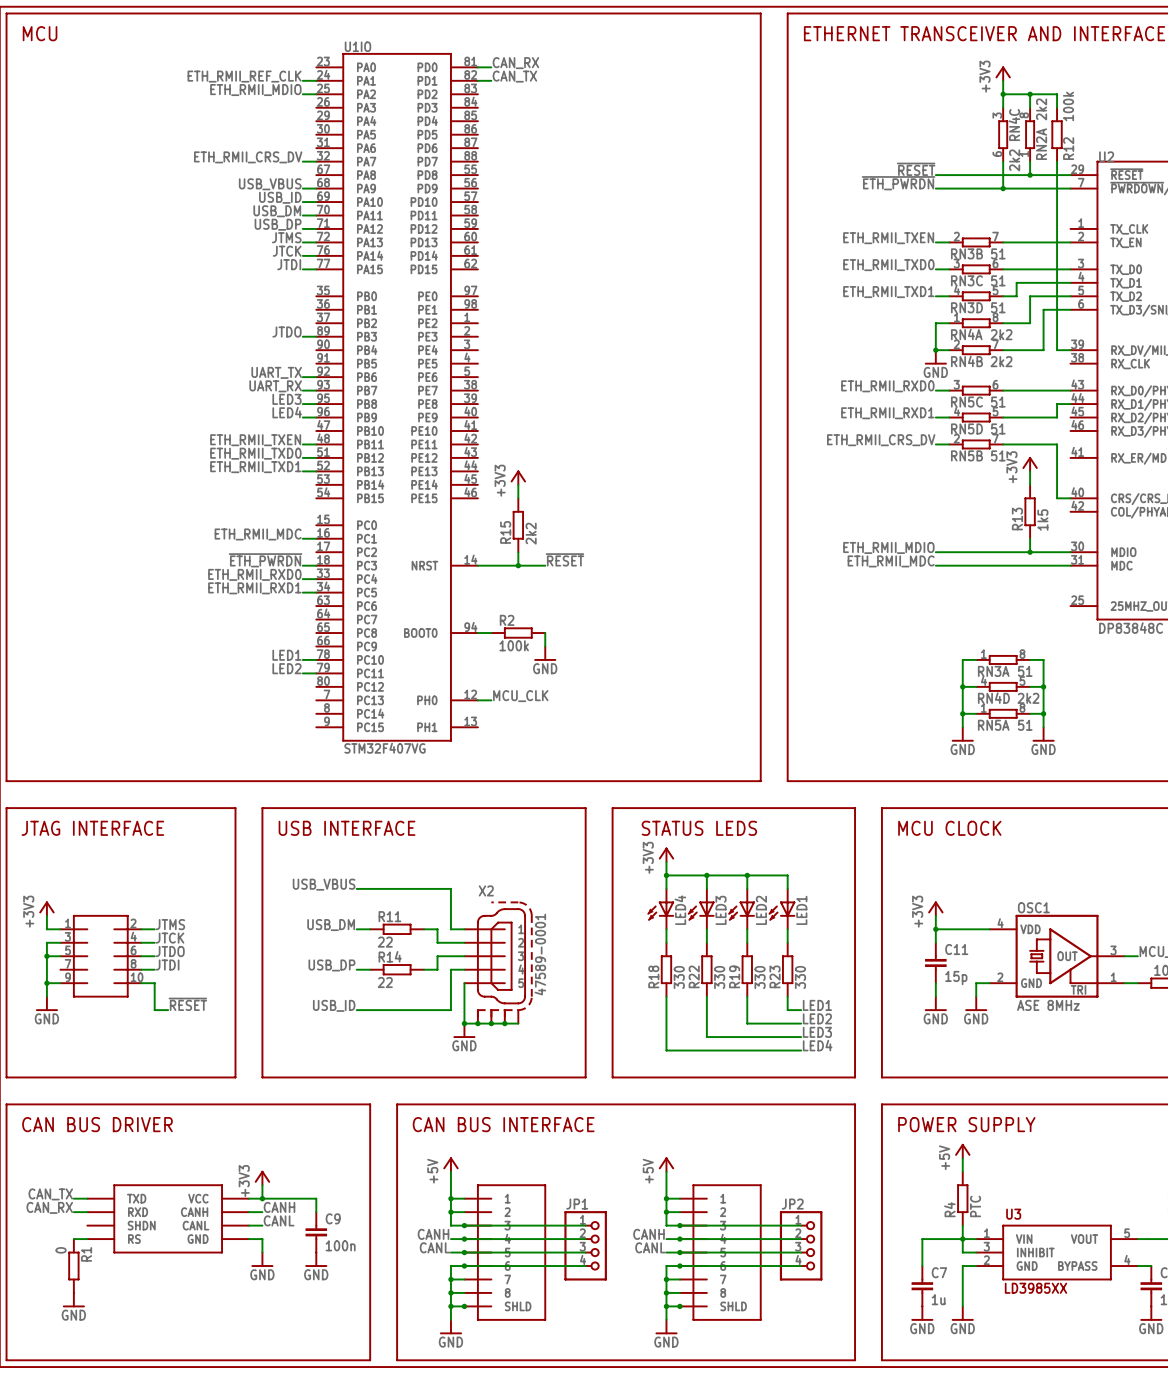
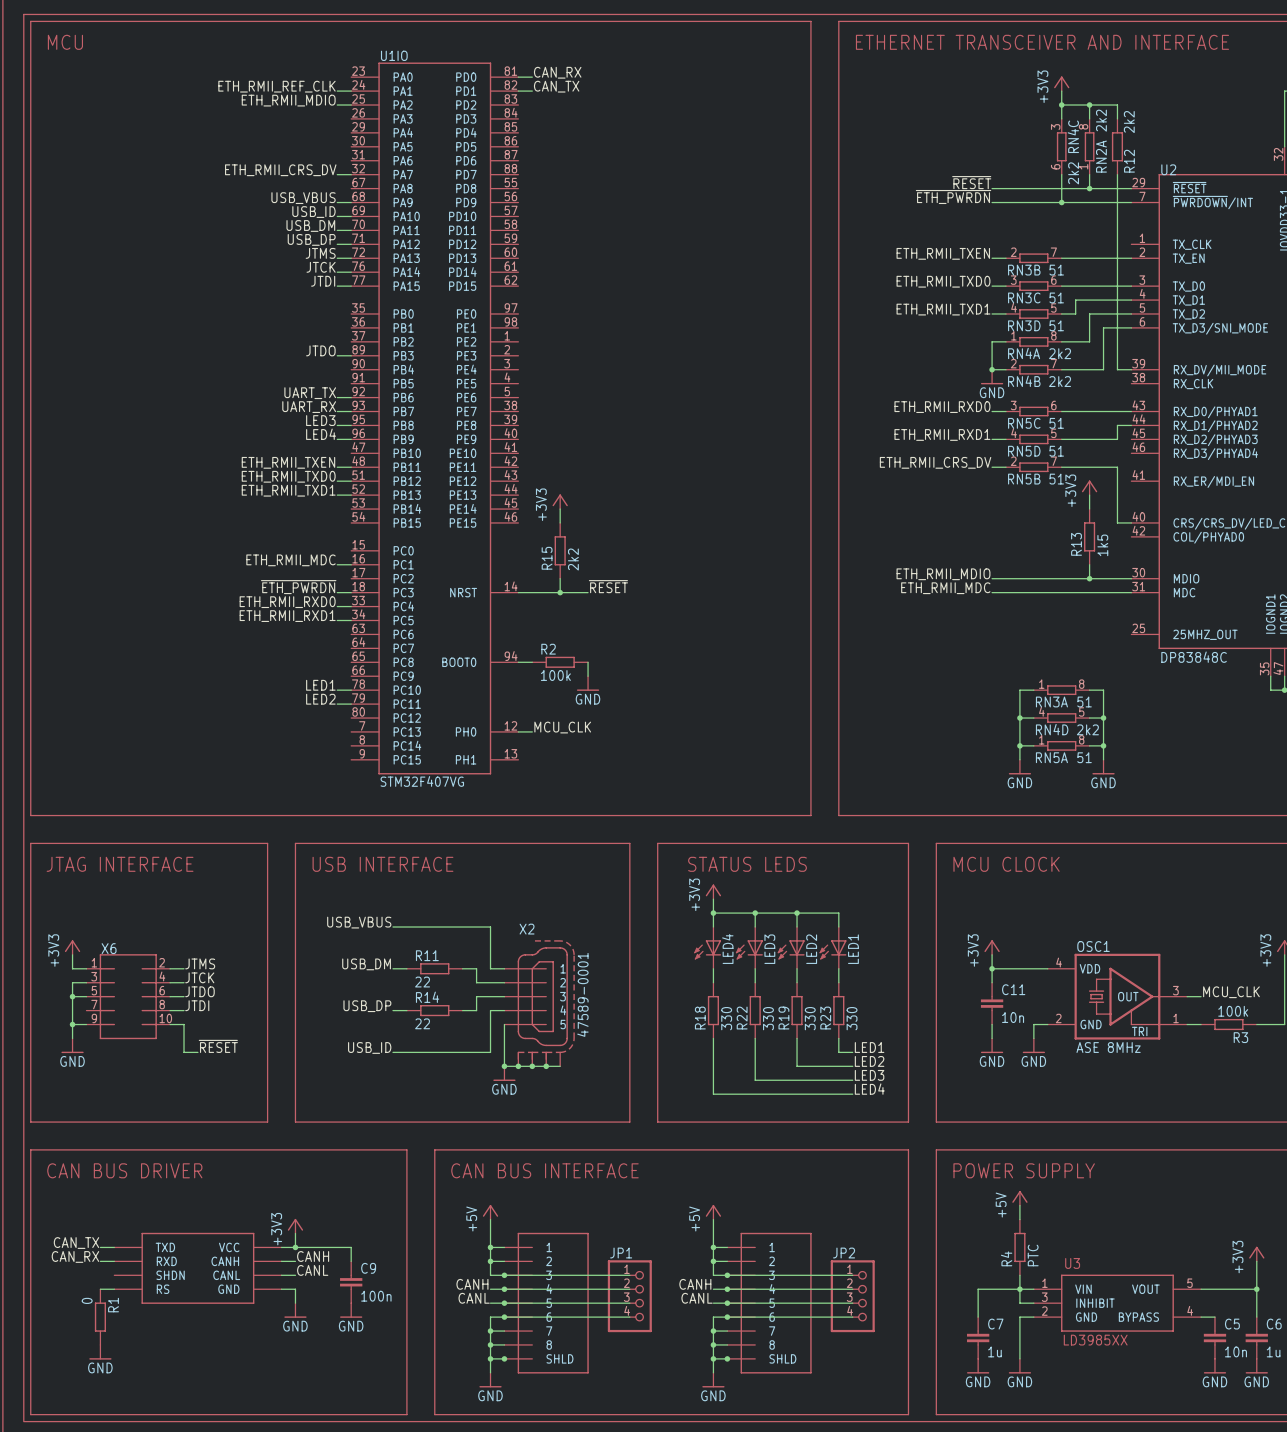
R12 value: 100k (1068, 106) -> 2k2 (1129, 122)
X6 name: none -> X6 (109, 948)
C11 value: 15p (956, 978) -> 10n (1013, 1017)

